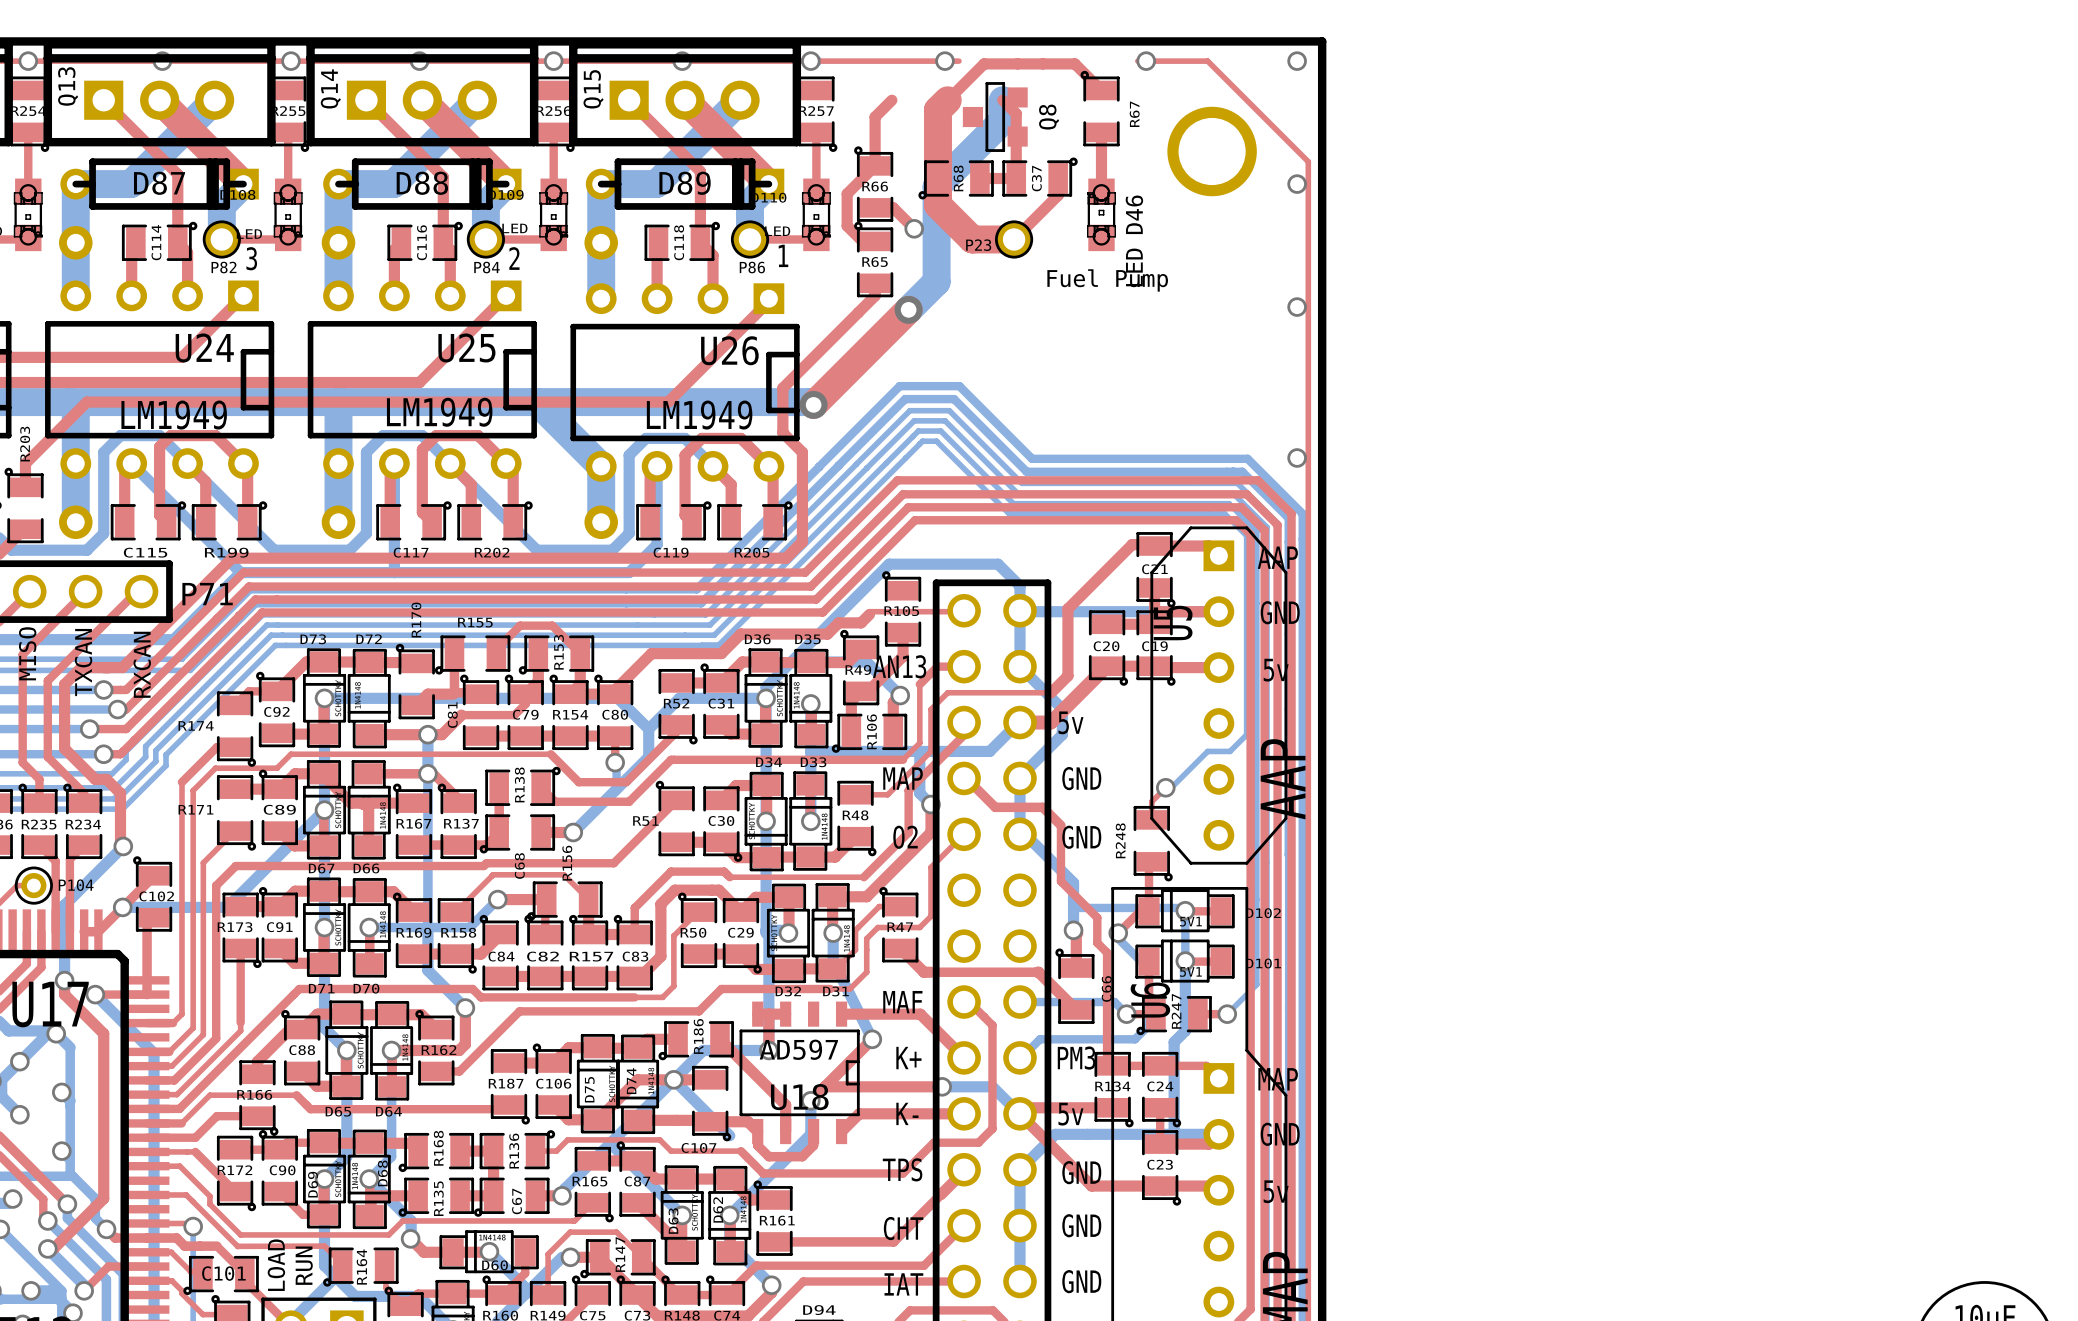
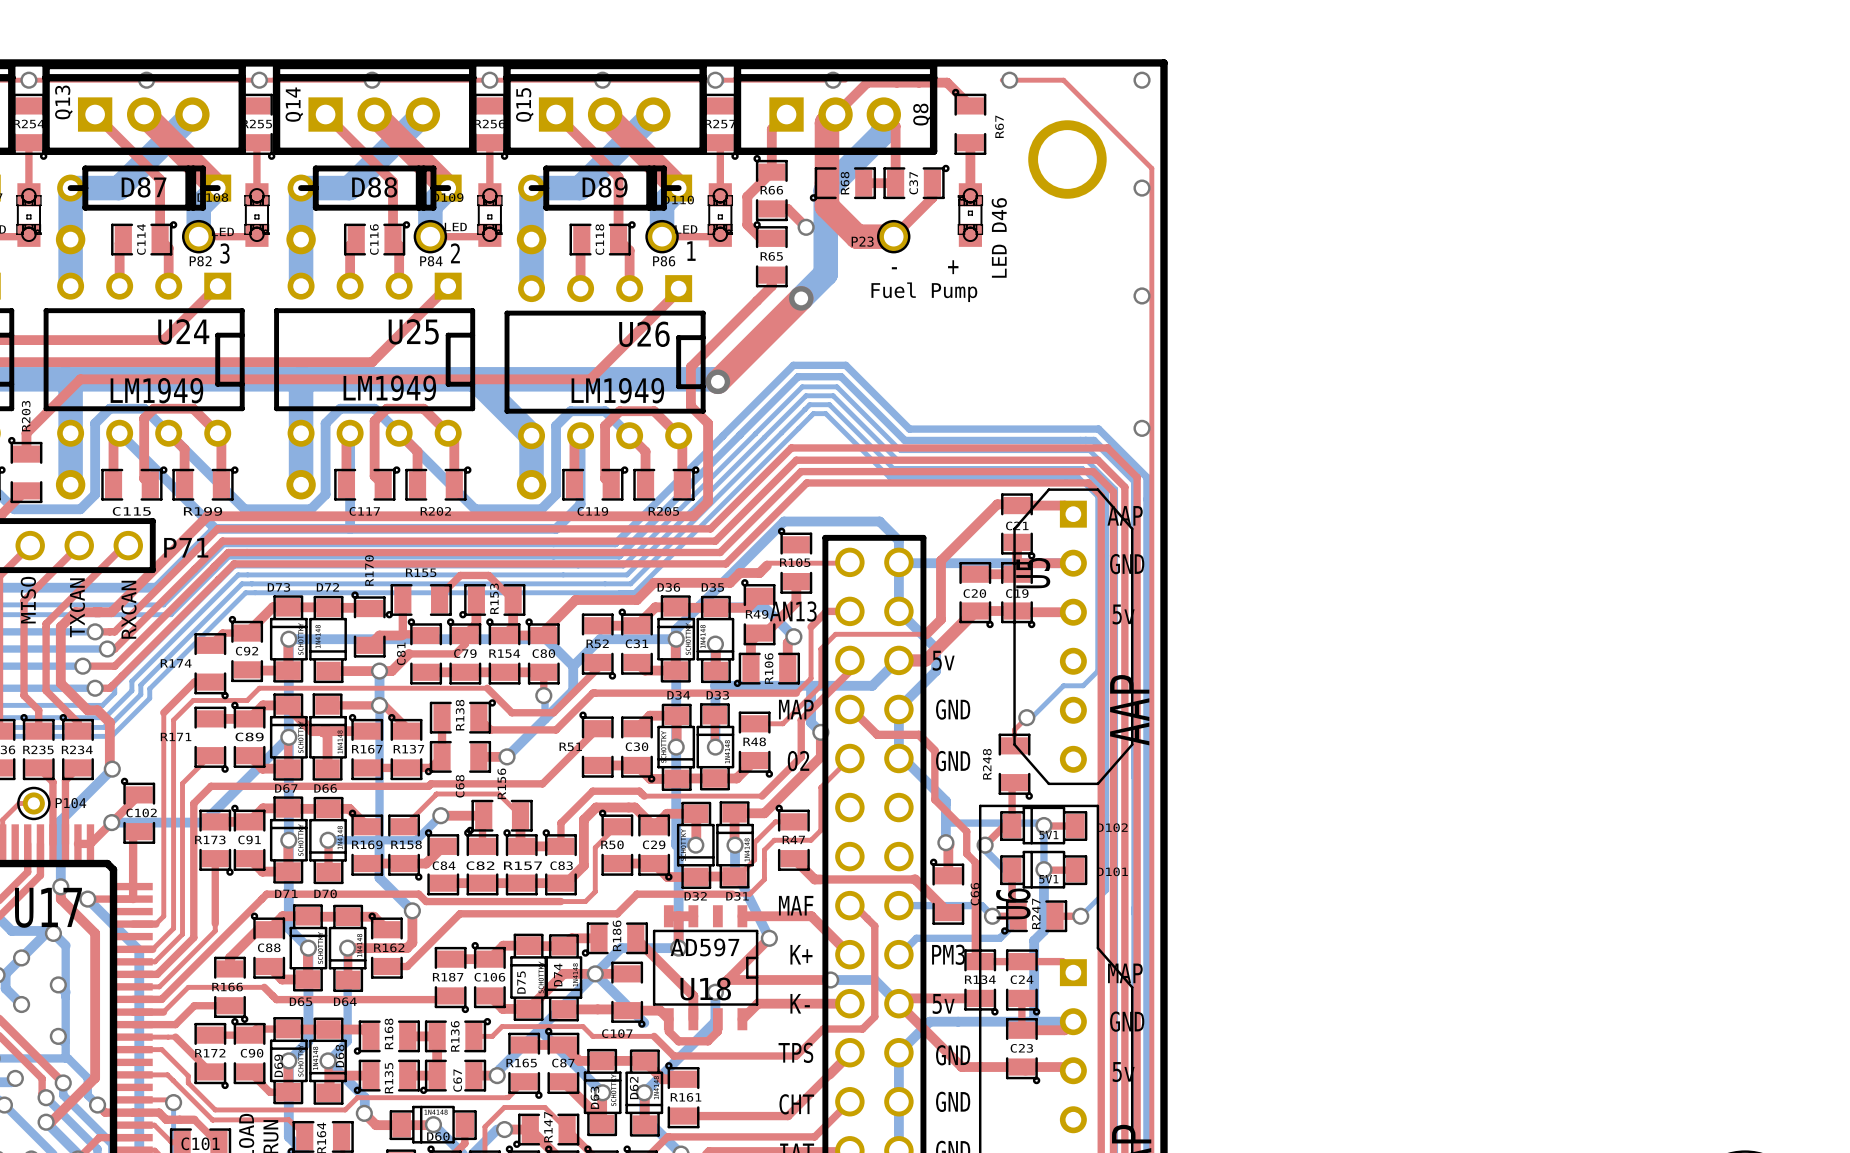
Q8 footprint: [962, 82, 1028, 152] -> [733, 61, 938, 155]
Q8 name position: Q8 (1049, 117) -> Q8 (922, 114)
text: none -> + (953, 267)
text: none -> - (894, 268)
text position: Fuel Pump (1107, 280) -> Fuel Pump (924, 292)

